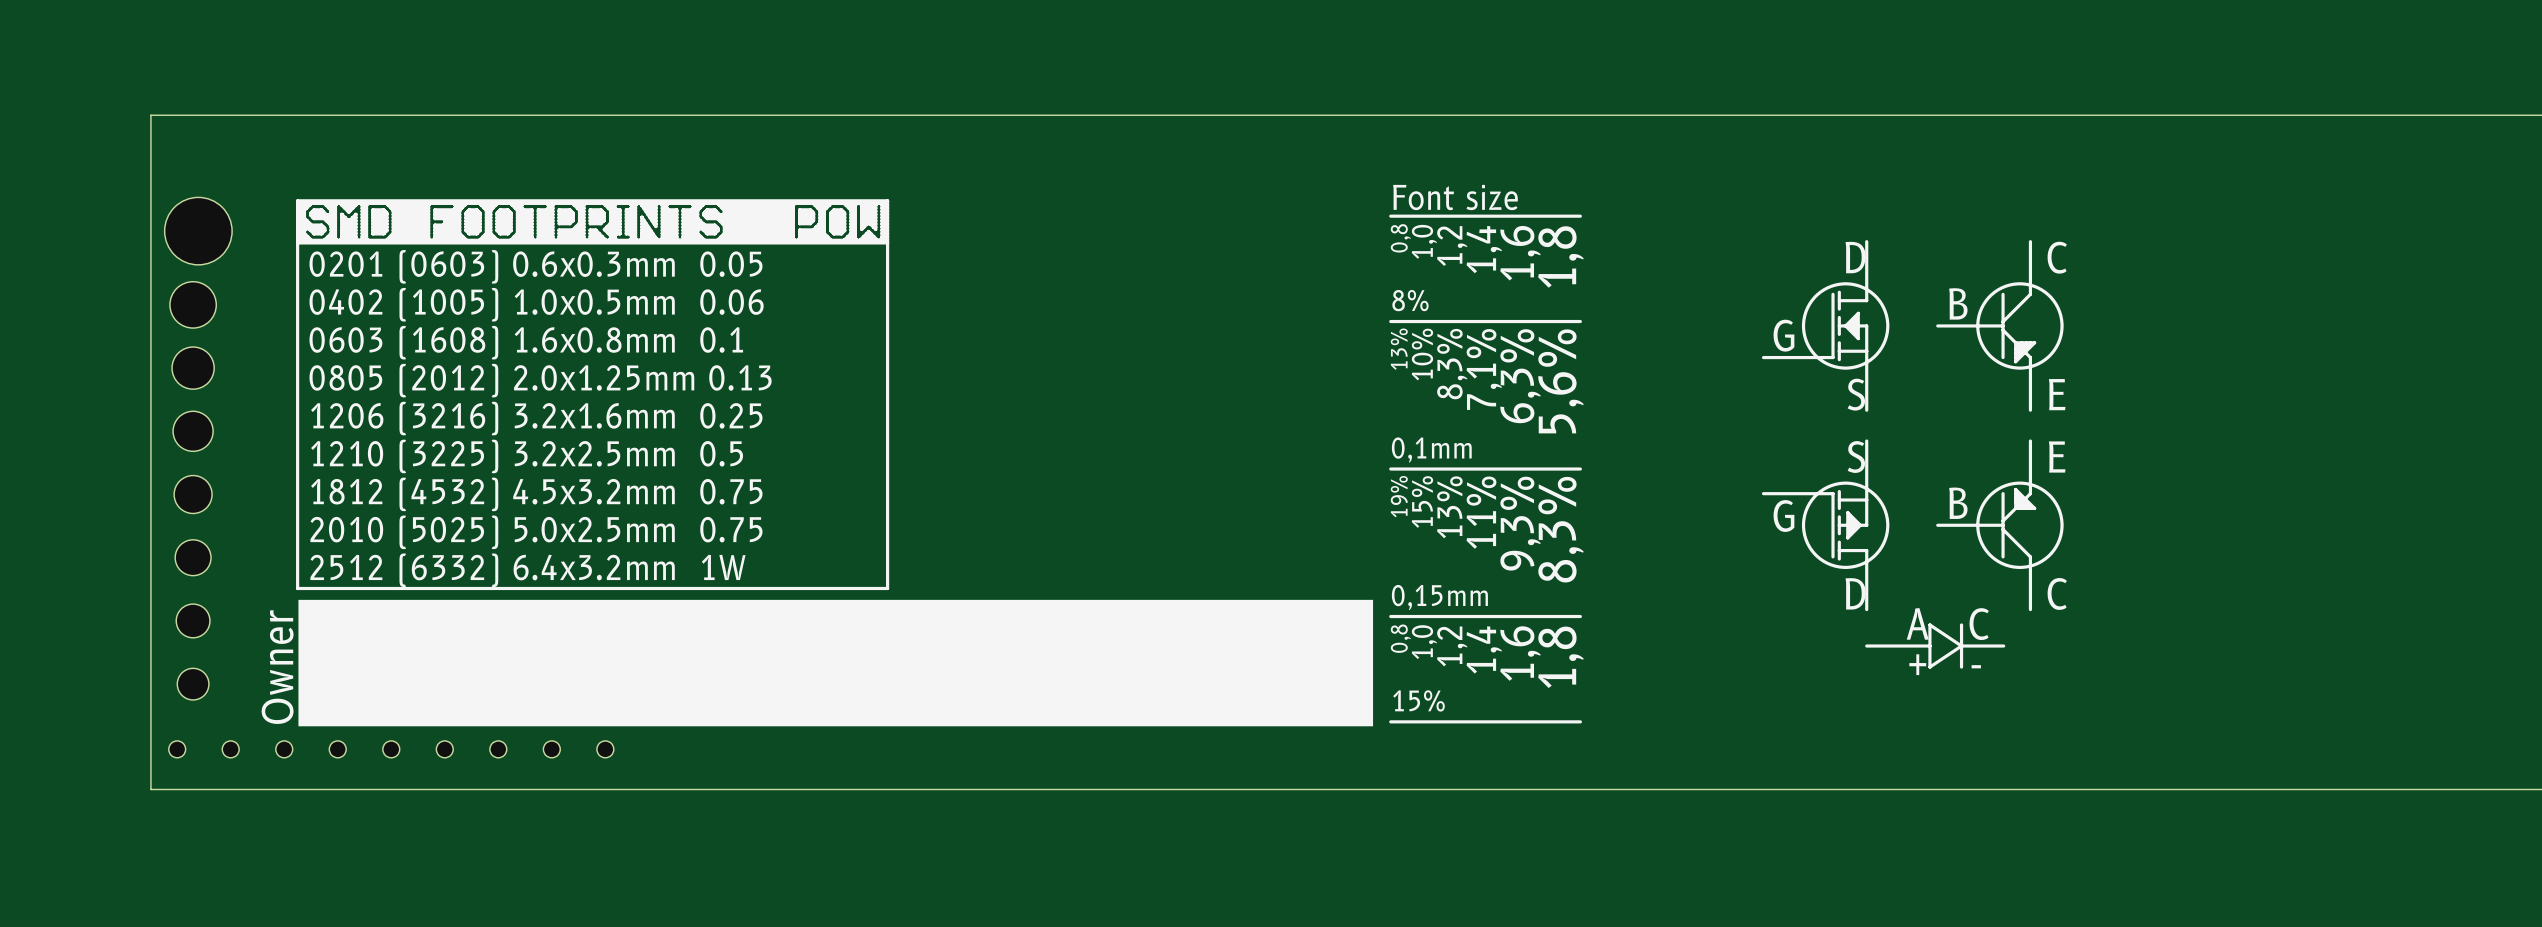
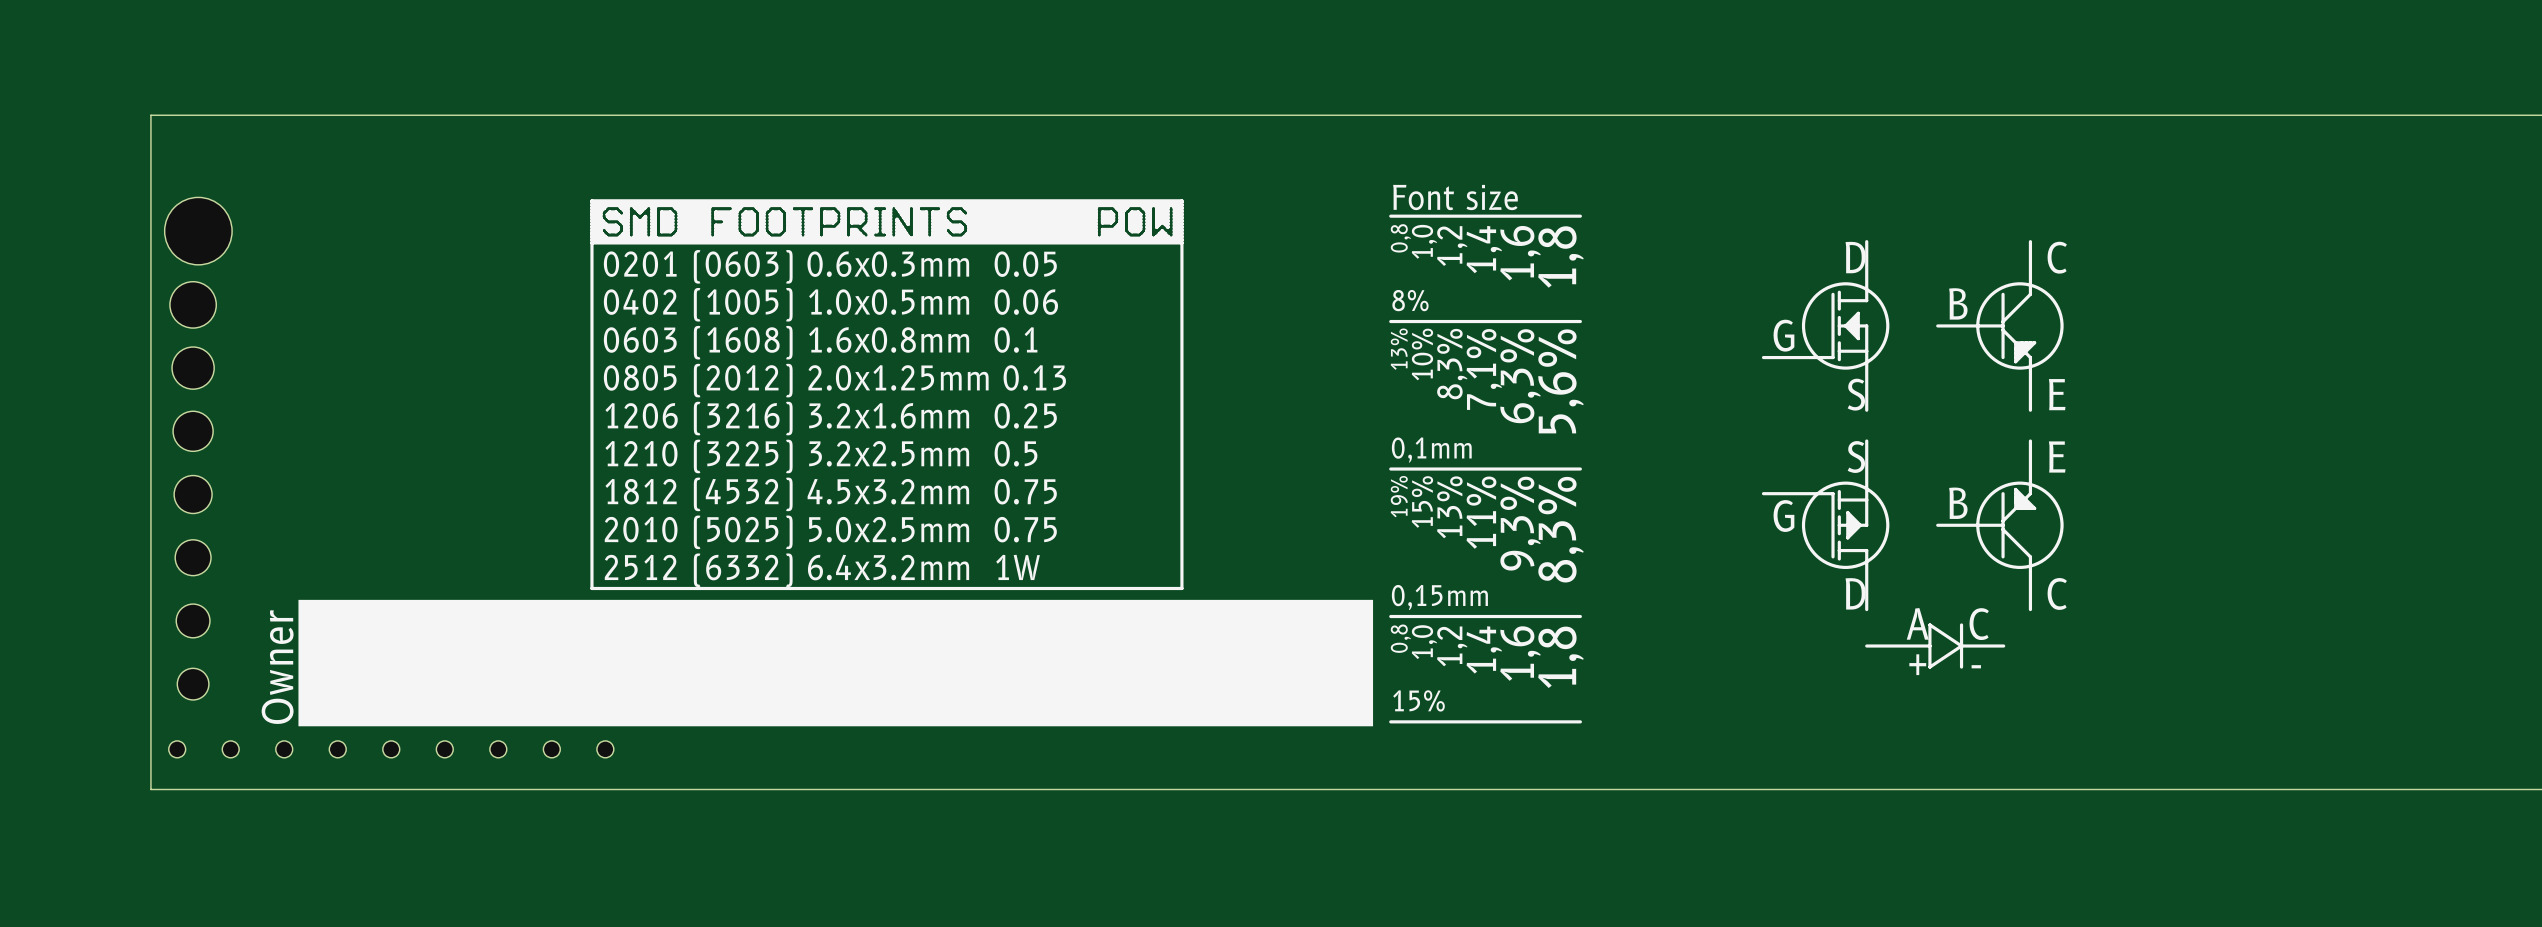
drawing: [296, 199, 890, 591] -> none
drawing: none -> [590, 199, 1184, 591]

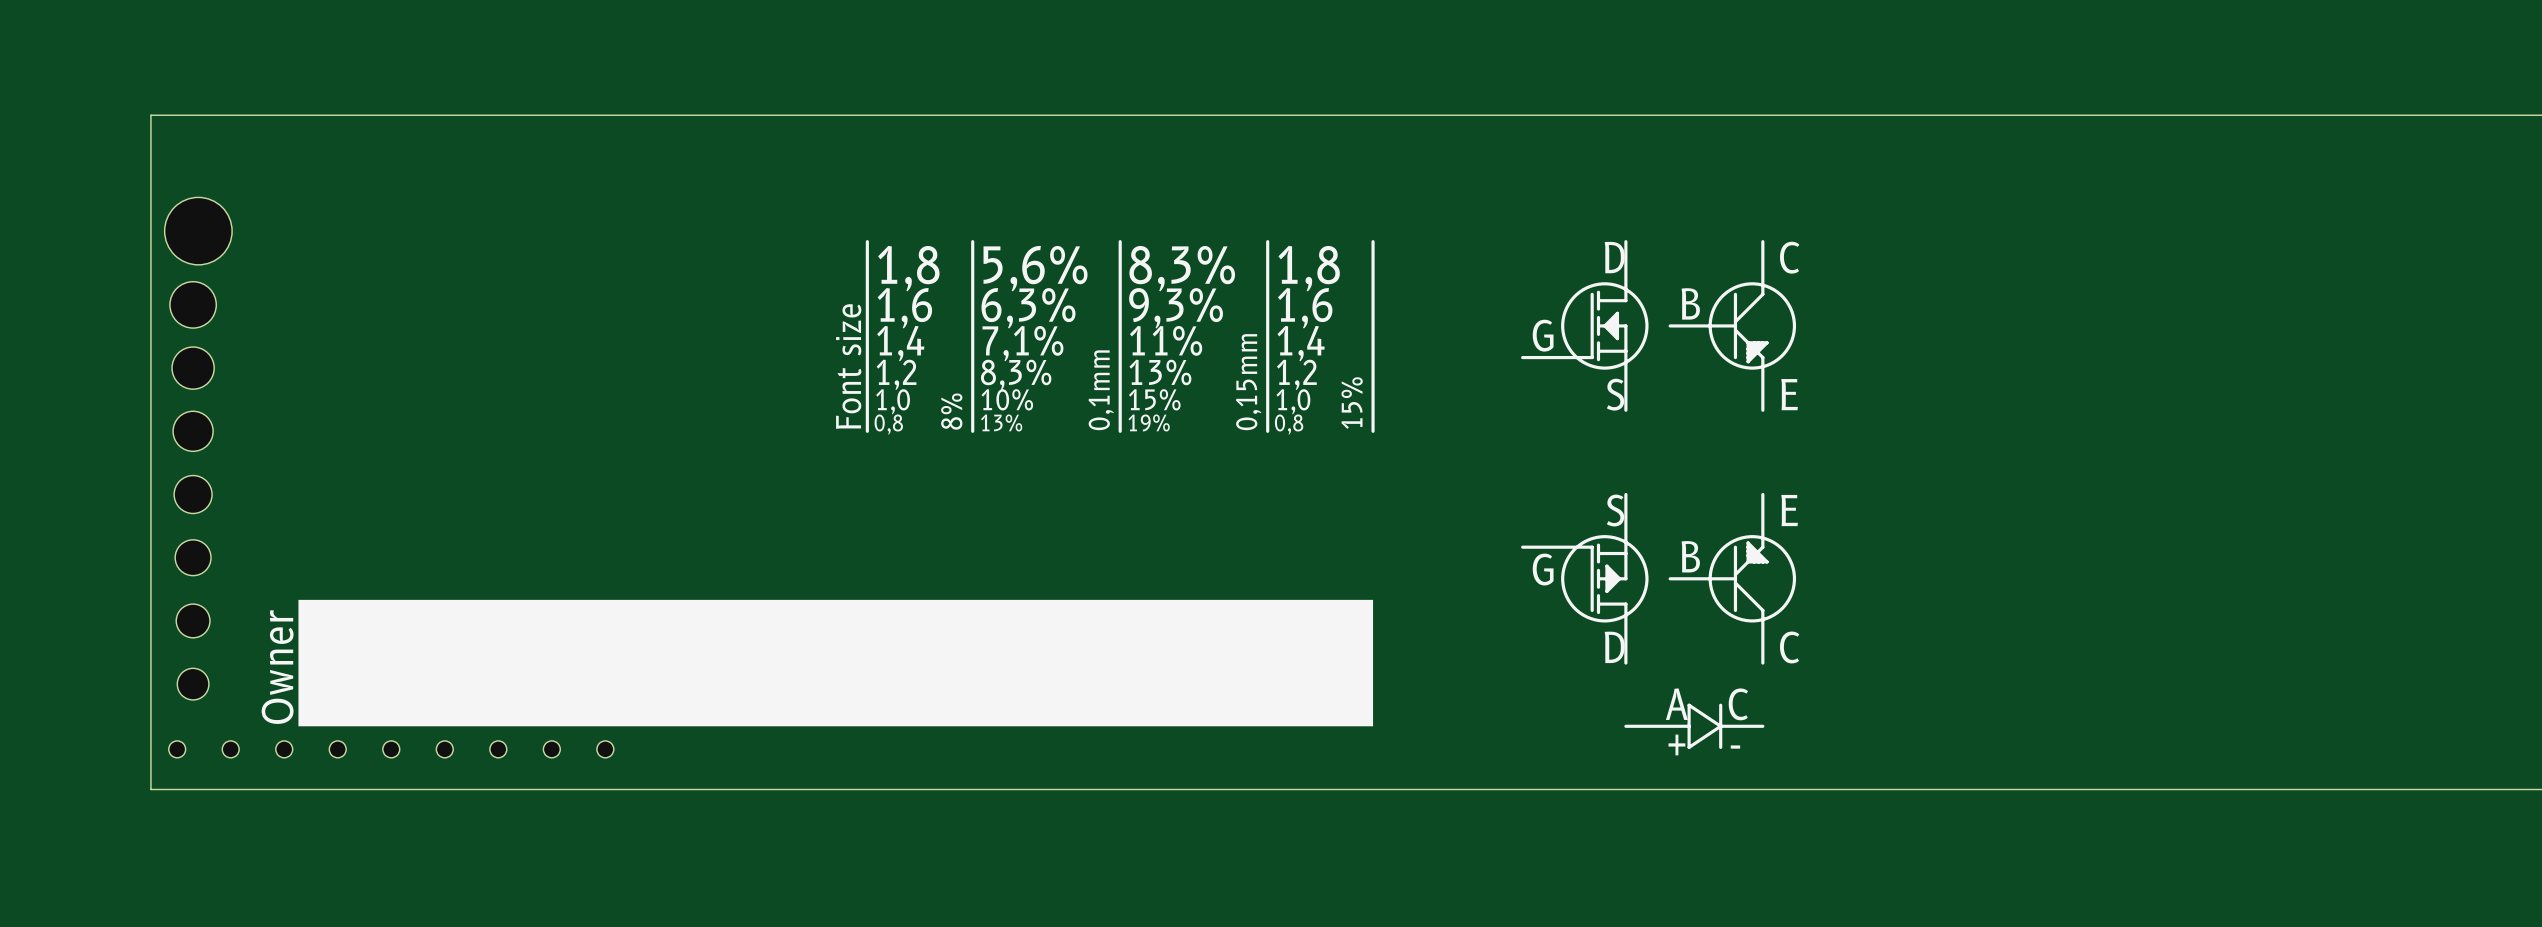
drawing: [590, 199, 1184, 591] -> none
drawing: [1389, 214, 1582, 724] -> none
drawing: none -> [865, 240, 1375, 433]
drawing position: (1825, 325) -> (1584, 325)
drawing position: (1999, 325) -> (1732, 325)
drawing position: (1825, 525) -> (1584, 578)
drawing position: (1999, 525) -> (1732, 578)
drawing position: (1935, 646) -> (1694, 726)

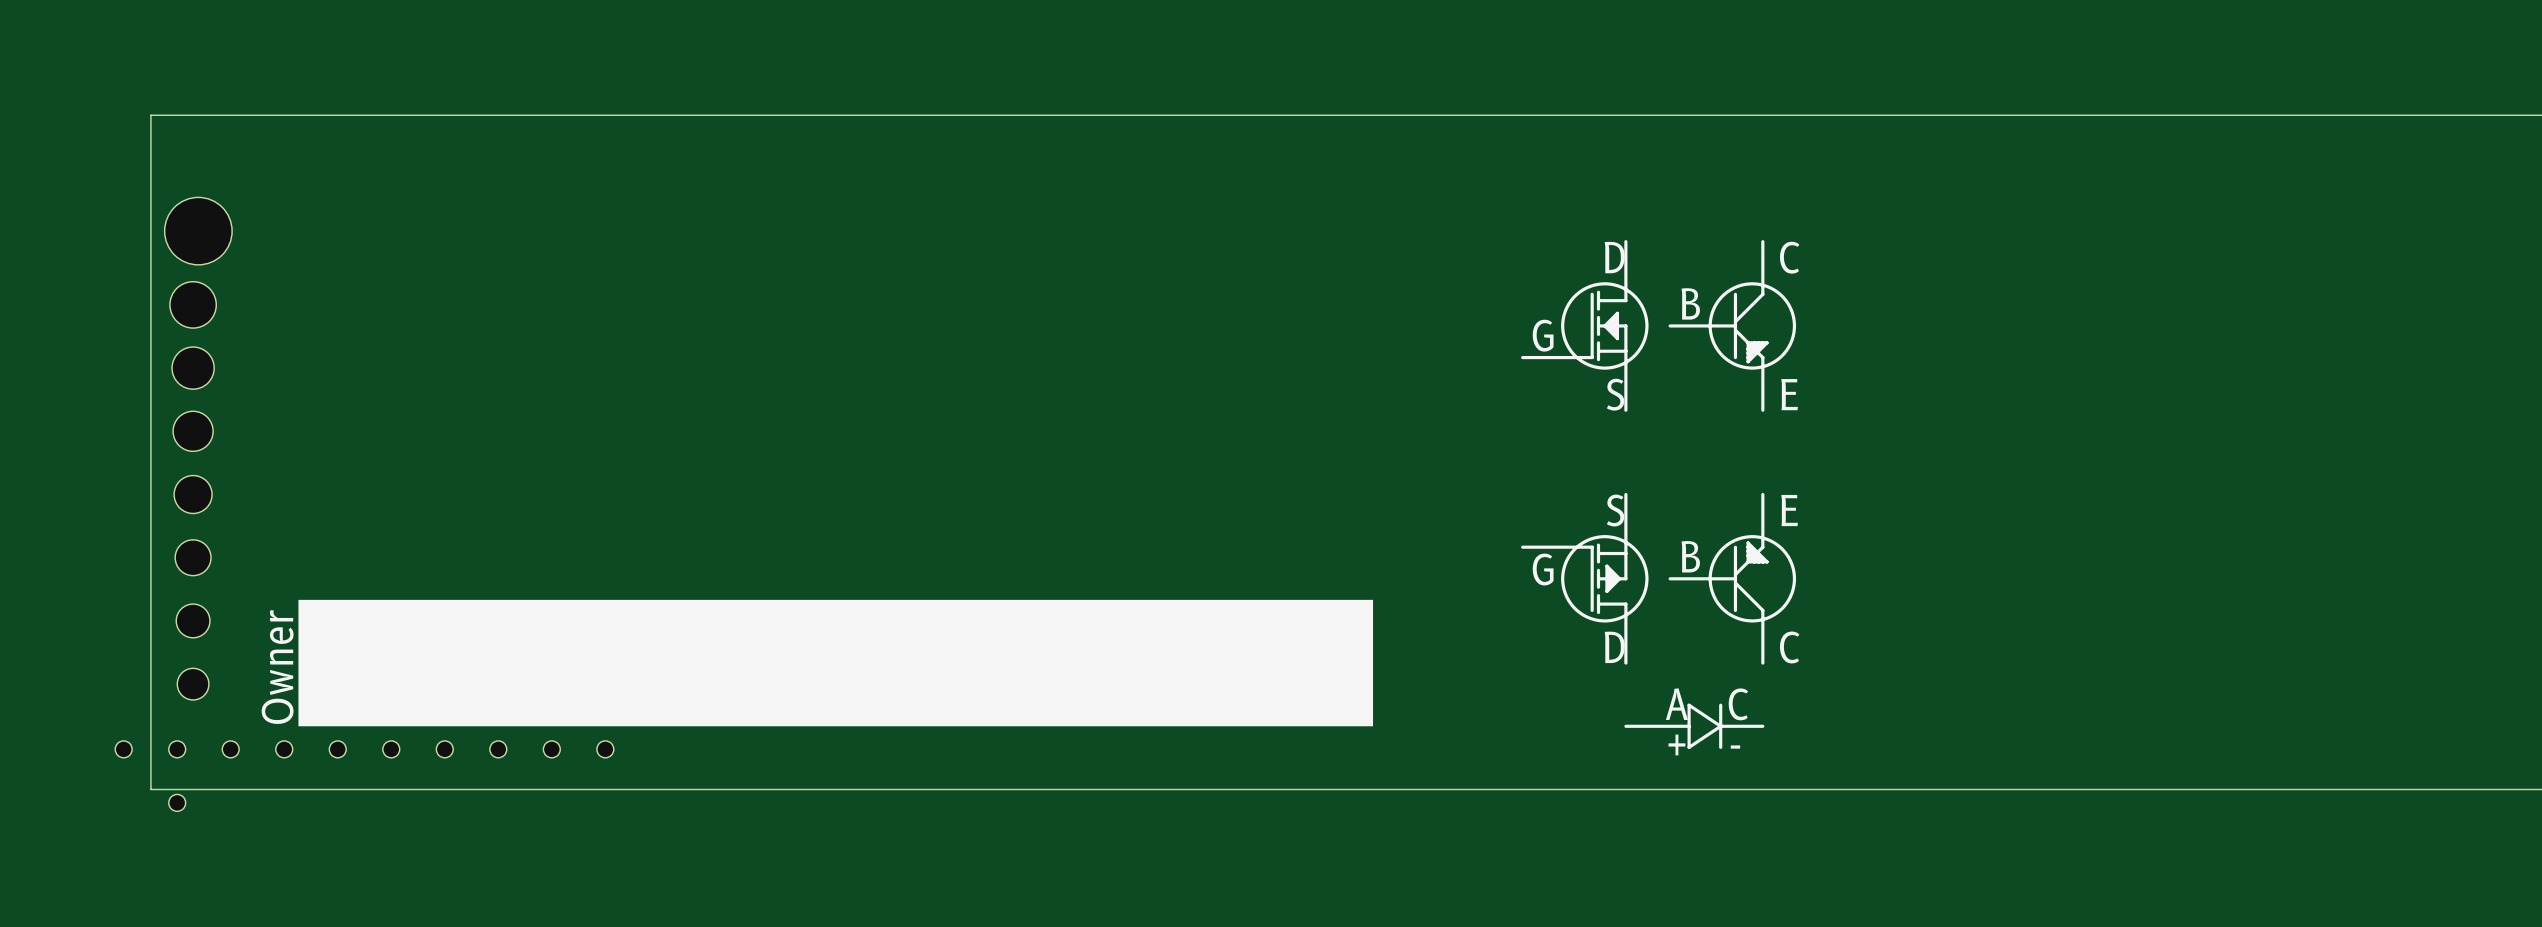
drawing: [865, 240, 1375, 433] -> none
hole: none -> (123, 749)
hole: none -> (177, 802)

